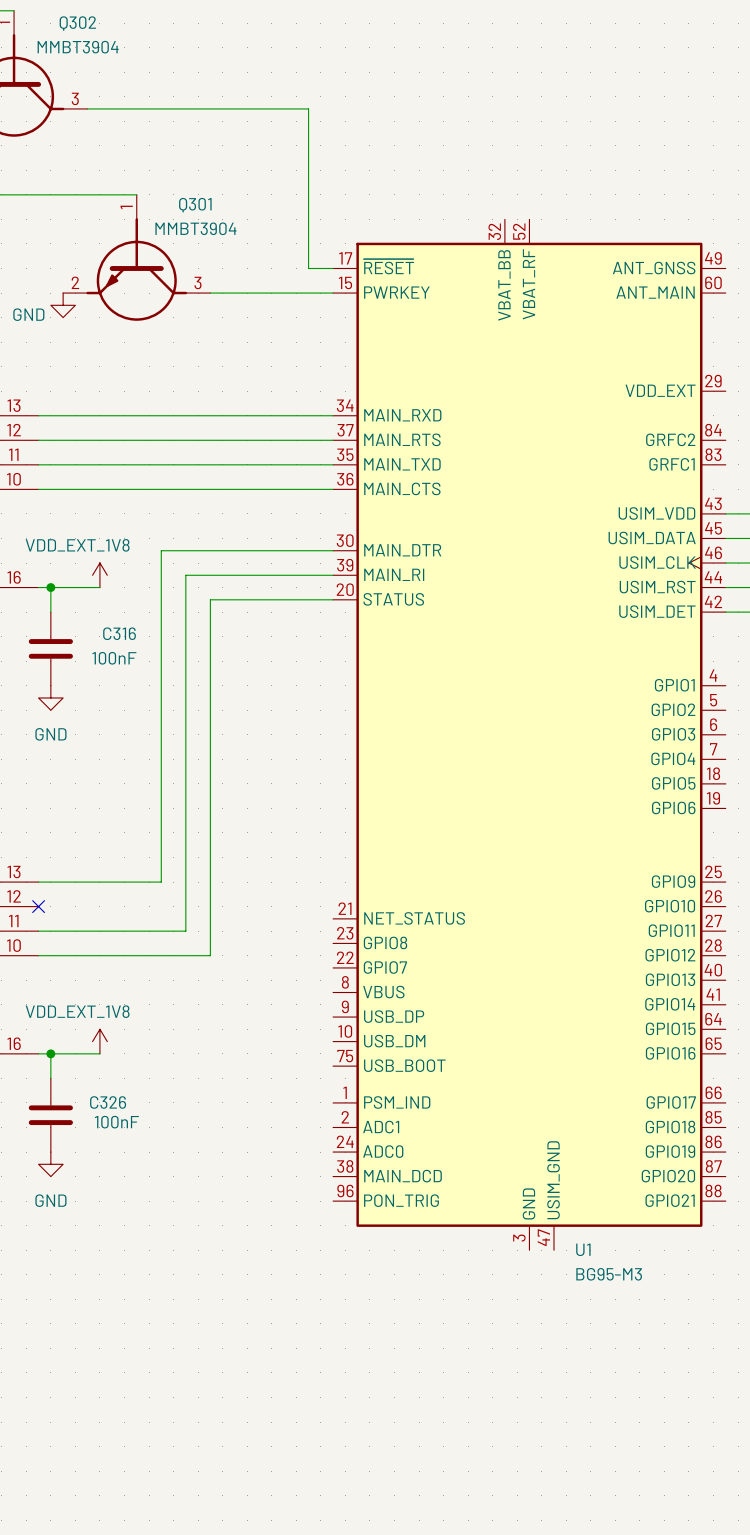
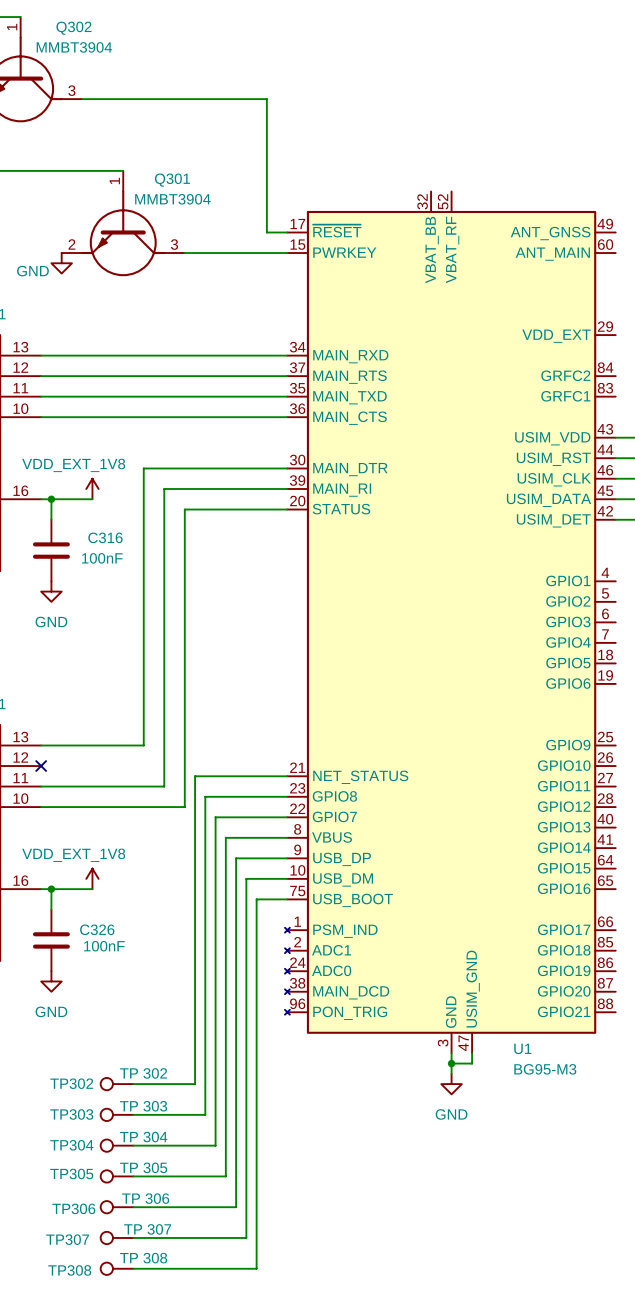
U1 symbol: [333, 219, 726, 1251] -> [284, 191, 616, 1054]
wire: none -> (287, 776) (195, 776) (195, 1084) (133, 1084)
wire: none -> (287, 796) (205, 796) (205, 1114) (133, 1114)
wire: none -> (287, 817) (215, 817) (215, 1145) (133, 1145)
wire: none -> (287, 837) (225, 837) (225, 1176) (133, 1176)
wire: none -> (287, 858) (236, 858) (236, 1207) (133, 1207)
wire: none -> (287, 878) (246, 878) (246, 1237) (133, 1237)
wire: none -> (287, 899) (256, 899) (256, 1268) (133, 1268)
U1 name position: U1 (583, 1249) -> U1 (522, 1048)
wire: none -> (451, 1053) (451, 1073)
wire: none -> (472, 1053) (472, 1063) (451, 1063)
junction: none -> (451, 1063)
U1 value position: BG95-M3 (609, 1274) -> BG95-M3 (545, 1069)
TP302: none -> TP 302 (117, 1084)
power symbol: none -> GND (451, 1084)
TP303: none -> TP 303 (117, 1114)
TP304: none -> TP 304 (117, 1145)
TP305: none -> TP 305 (117, 1176)
TP306: none -> TP 306 (117, 1207)
TP307: none -> TP 307 (117, 1237)
TP308: none -> TP 308 (117, 1268)

